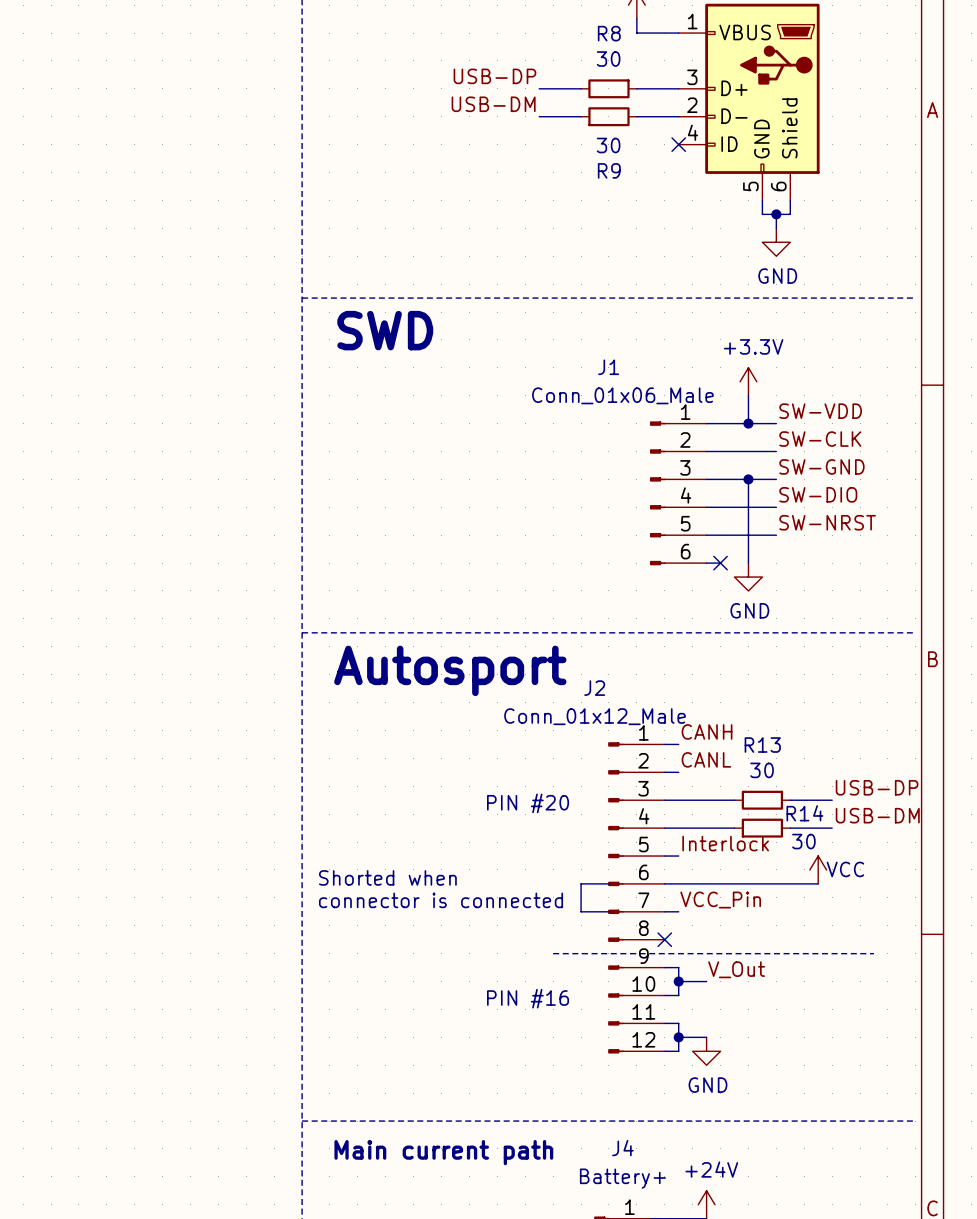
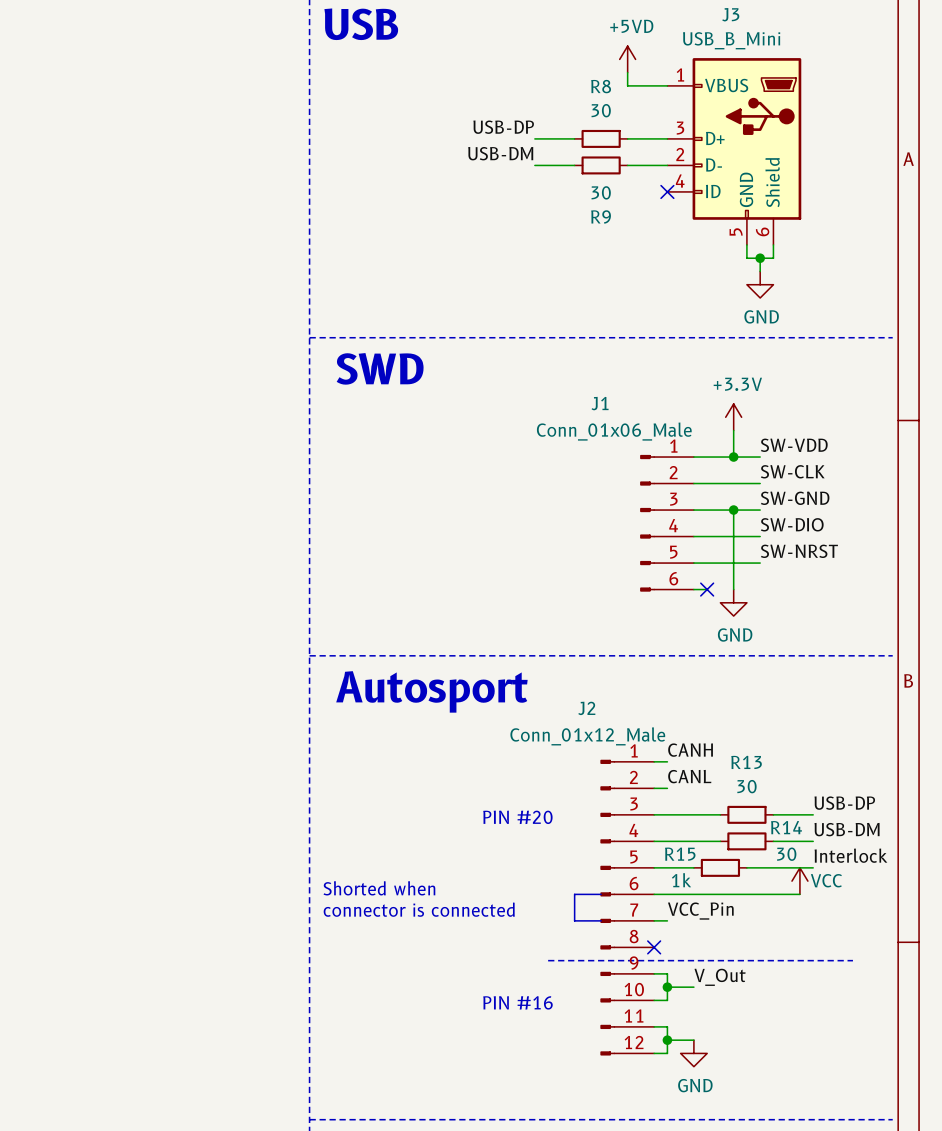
label position: Interlock (725, 843) -> Interlock (850, 855)
wire: none -> (667, 867) (693, 867)
R15: none -> 1k (720, 867)
wire: none -> (746, 867) (813, 867)

